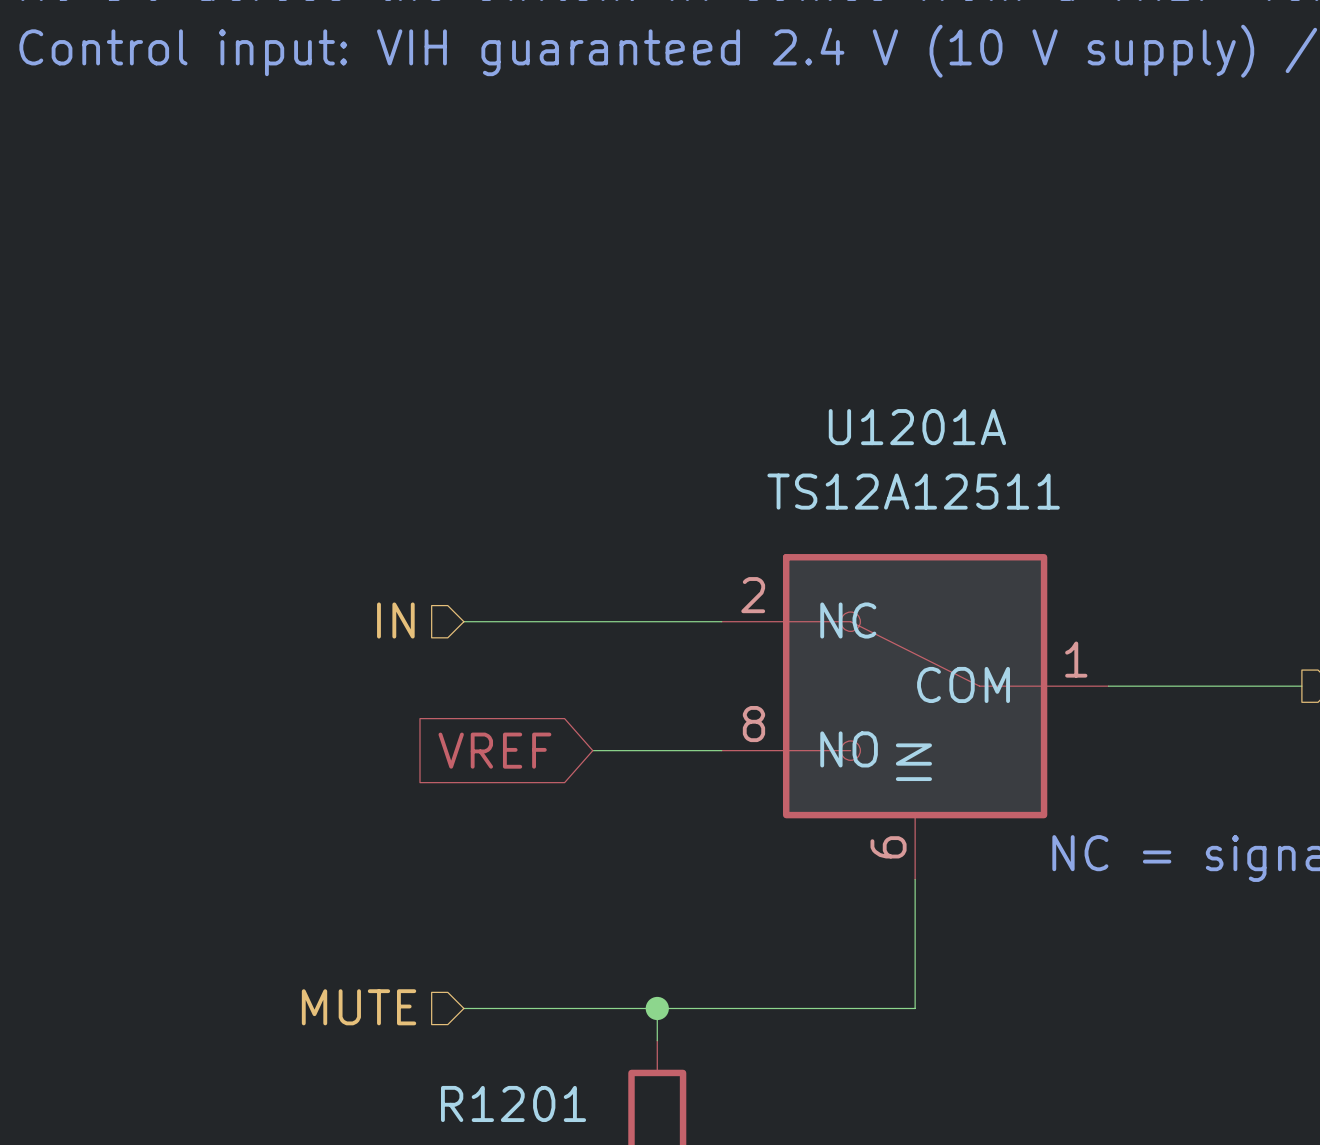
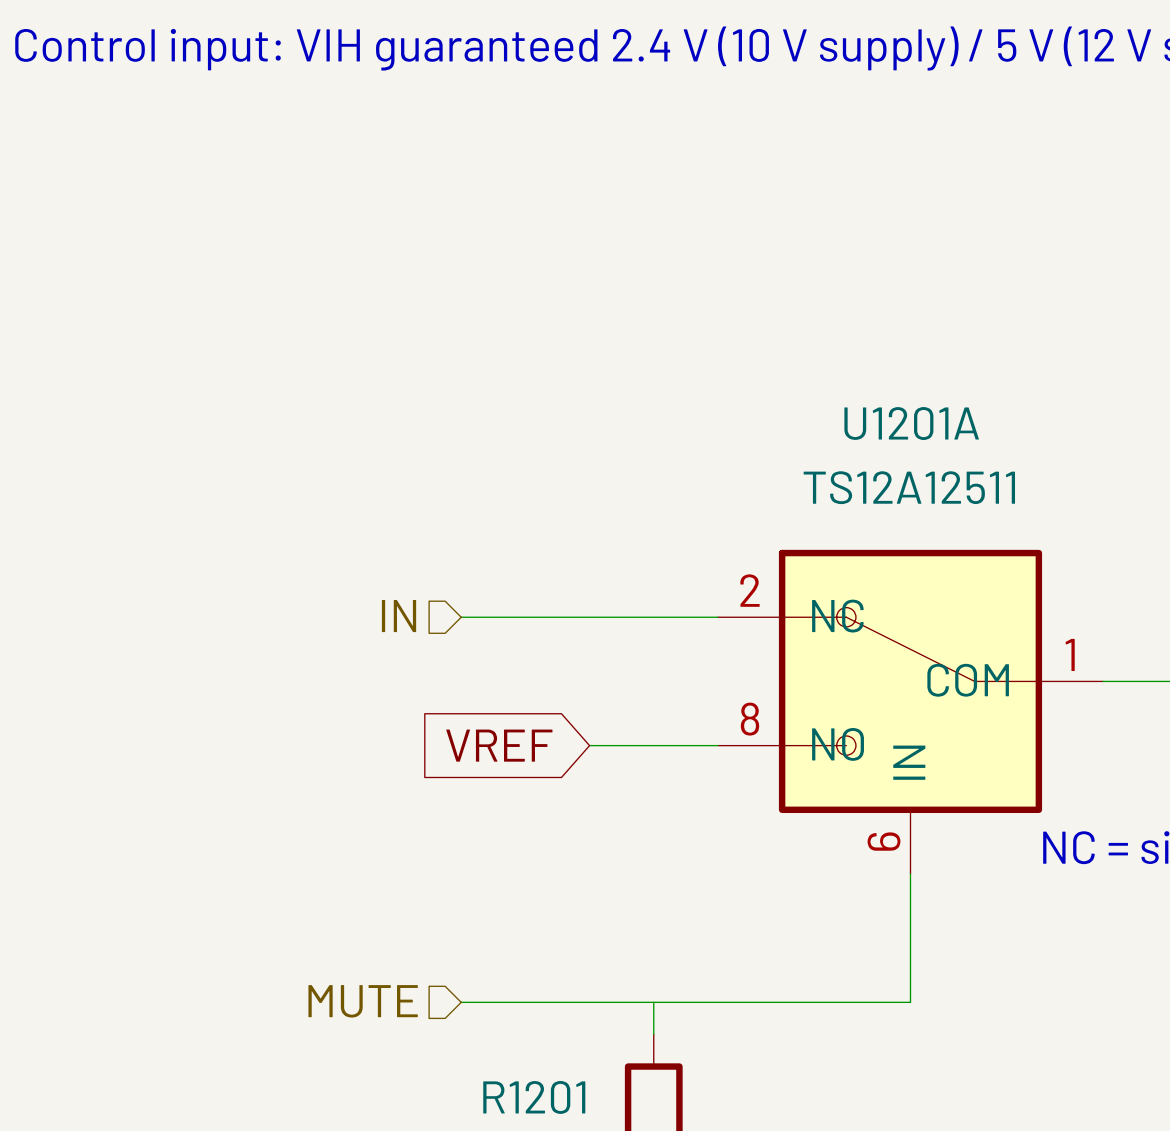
junction: (657, 1008) -> none

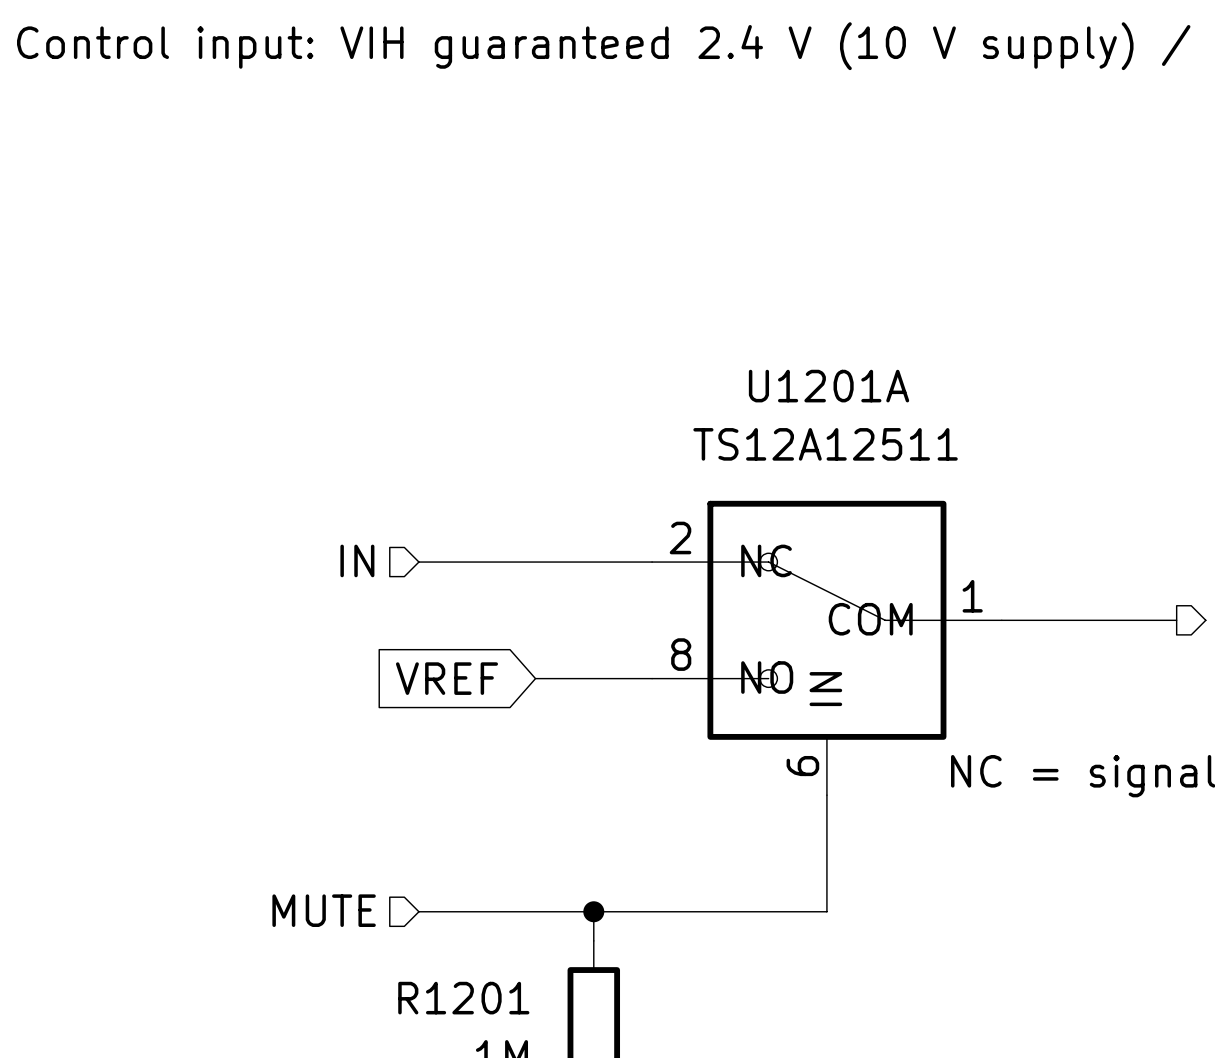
junction: none -> (593, 911)

